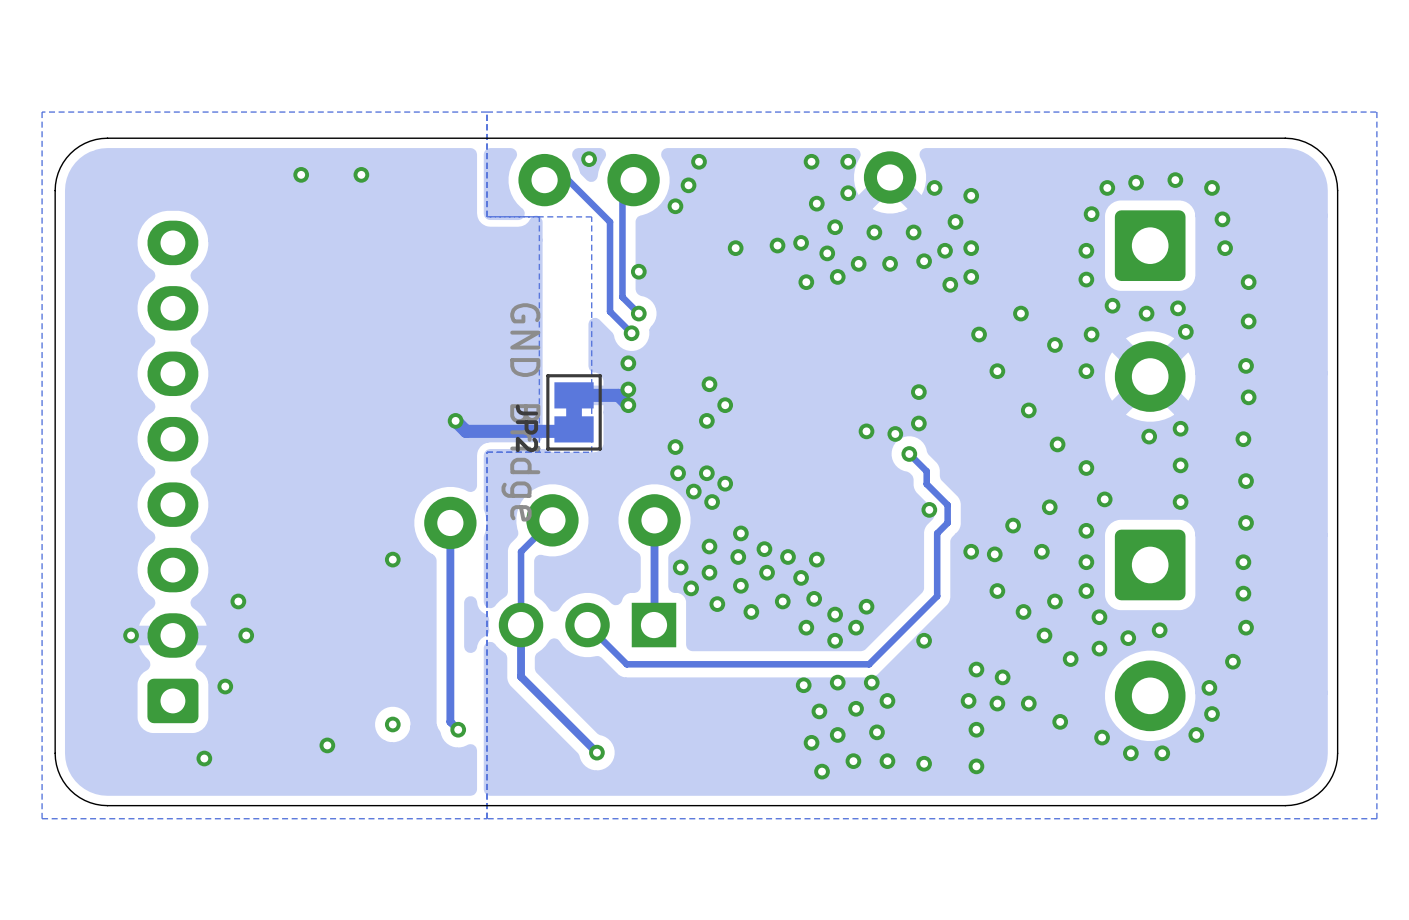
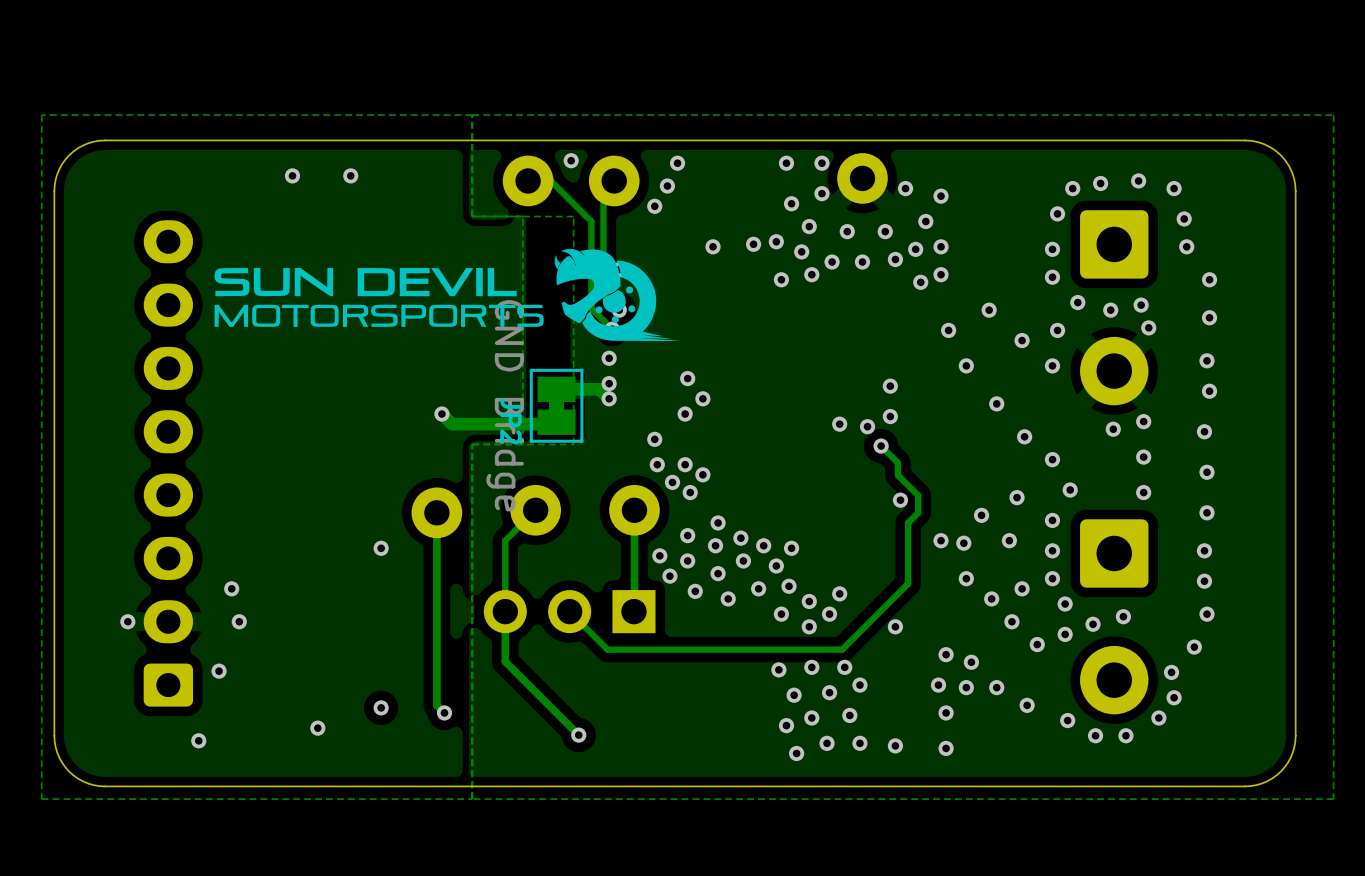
drawing: none -> [214, 248, 679, 342]

